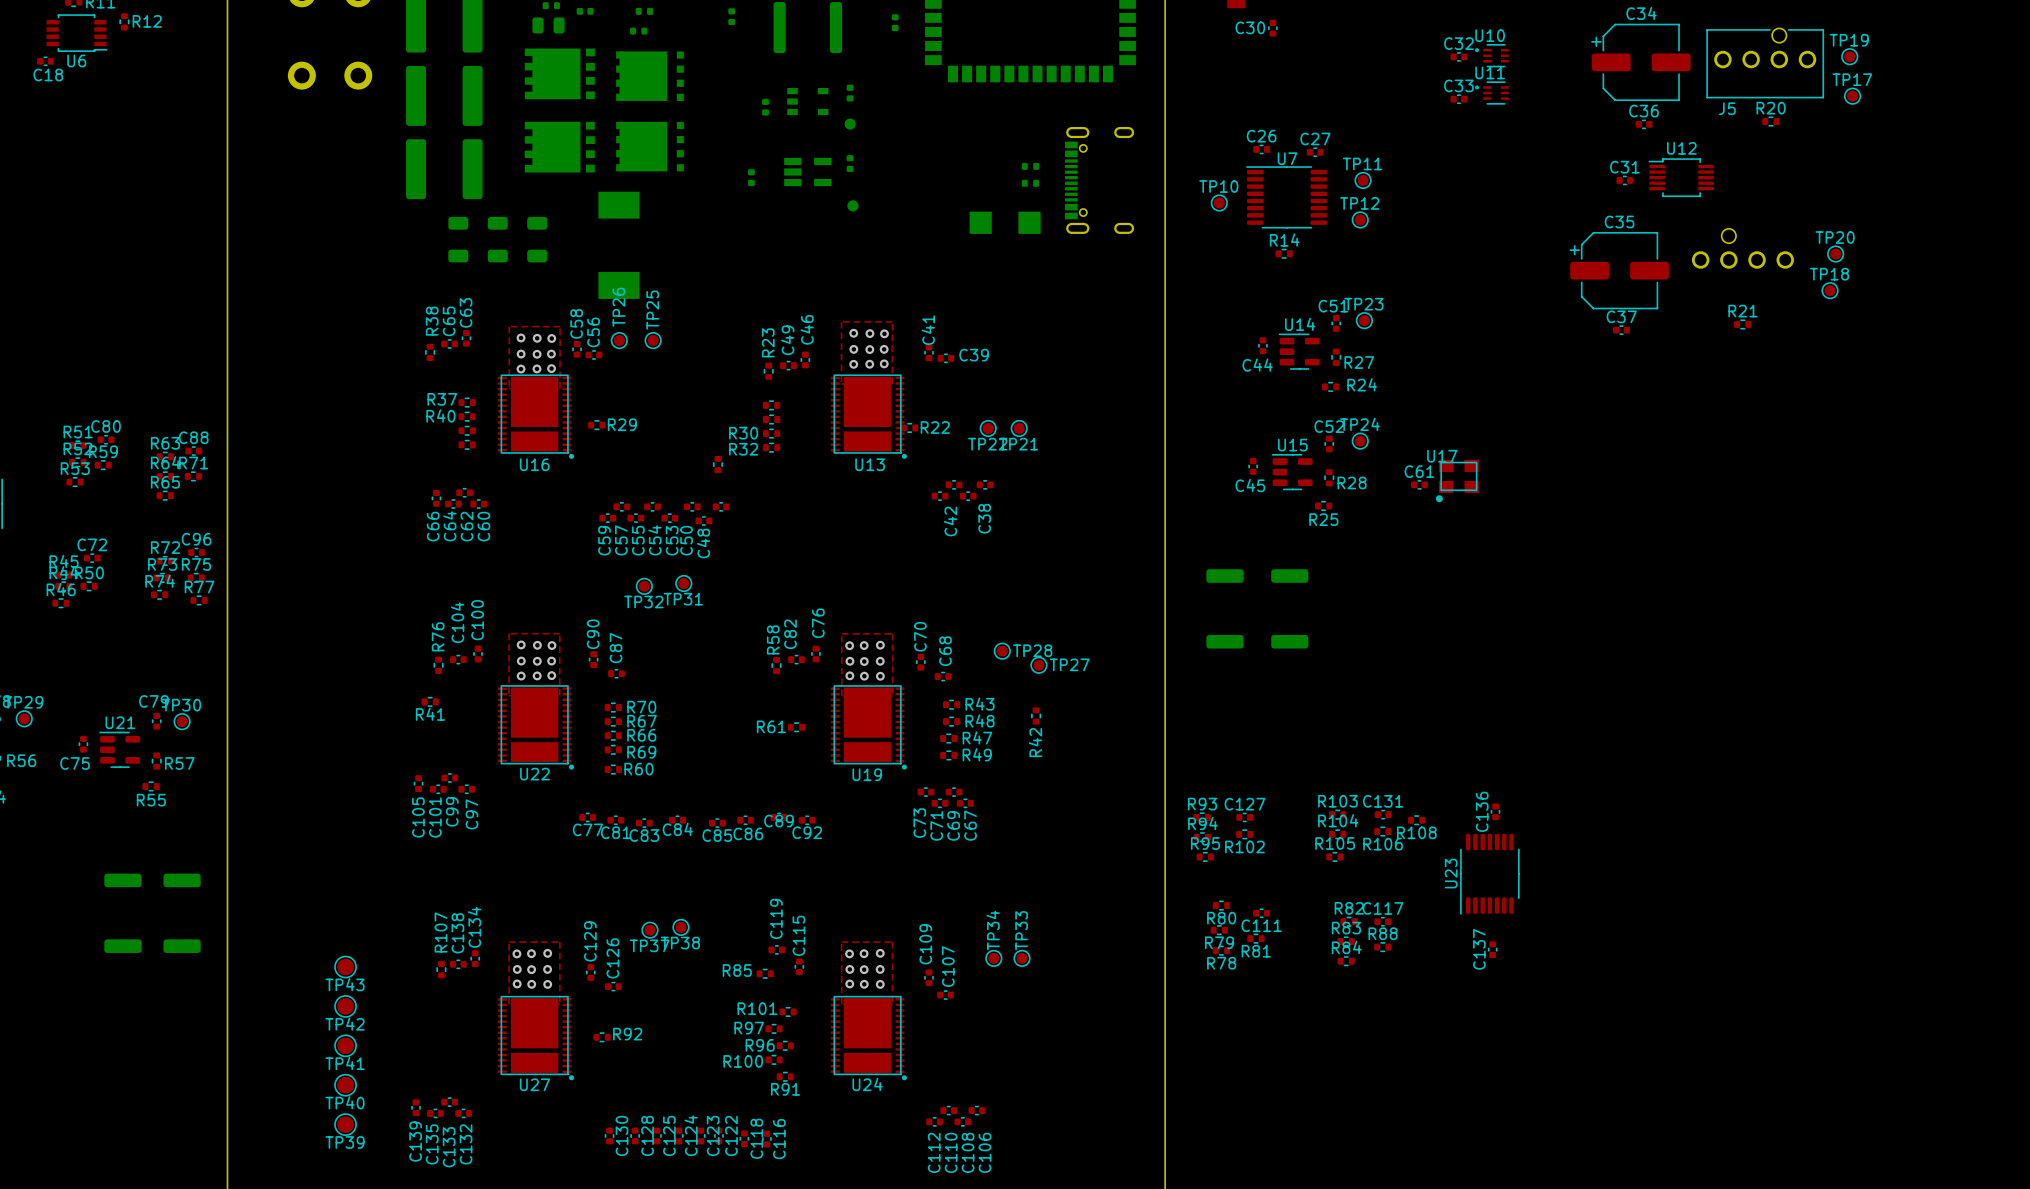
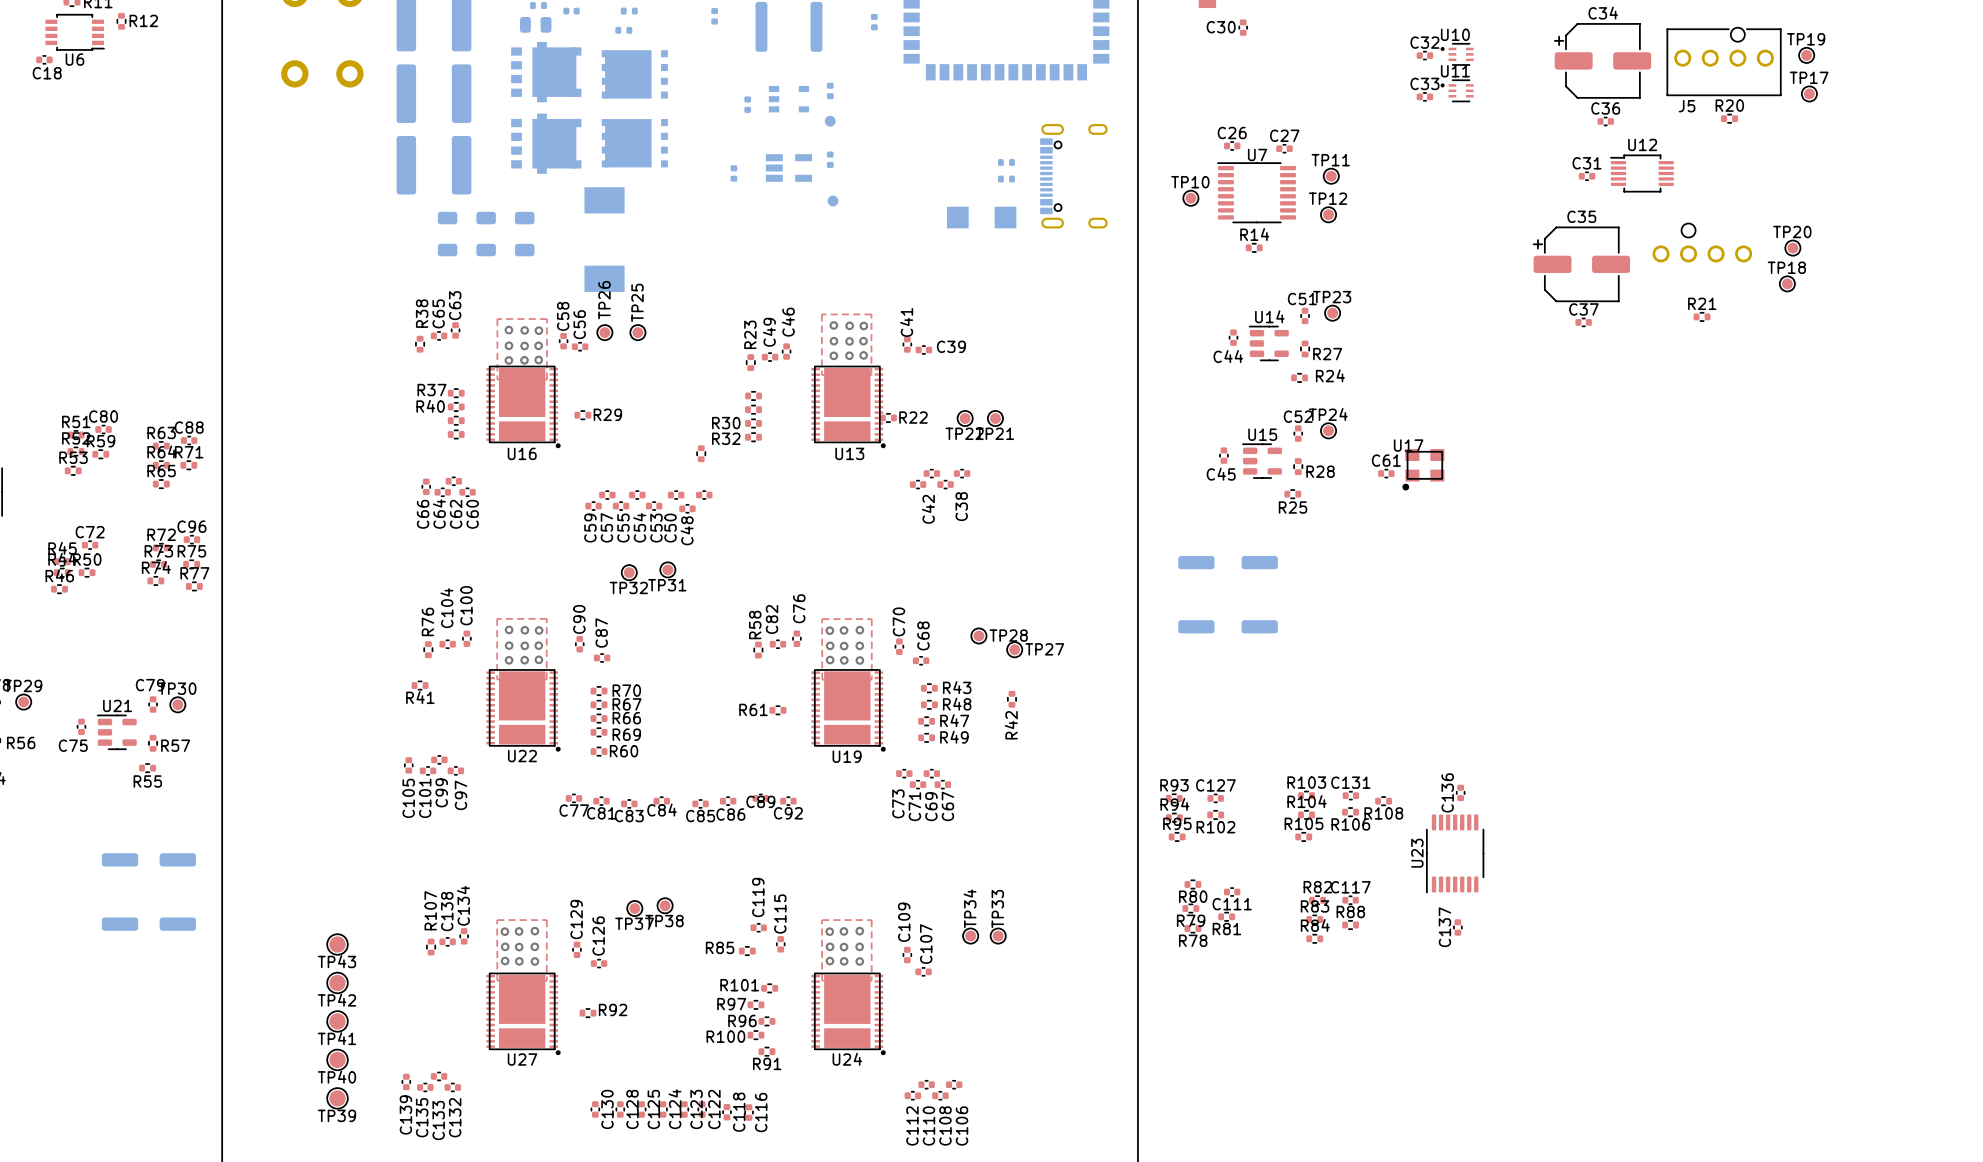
part footprint: [524, 48, 595, 100] -> [511, 42, 582, 103]
part footprint: [524, 121, 595, 173] -> [511, 113, 582, 174]

